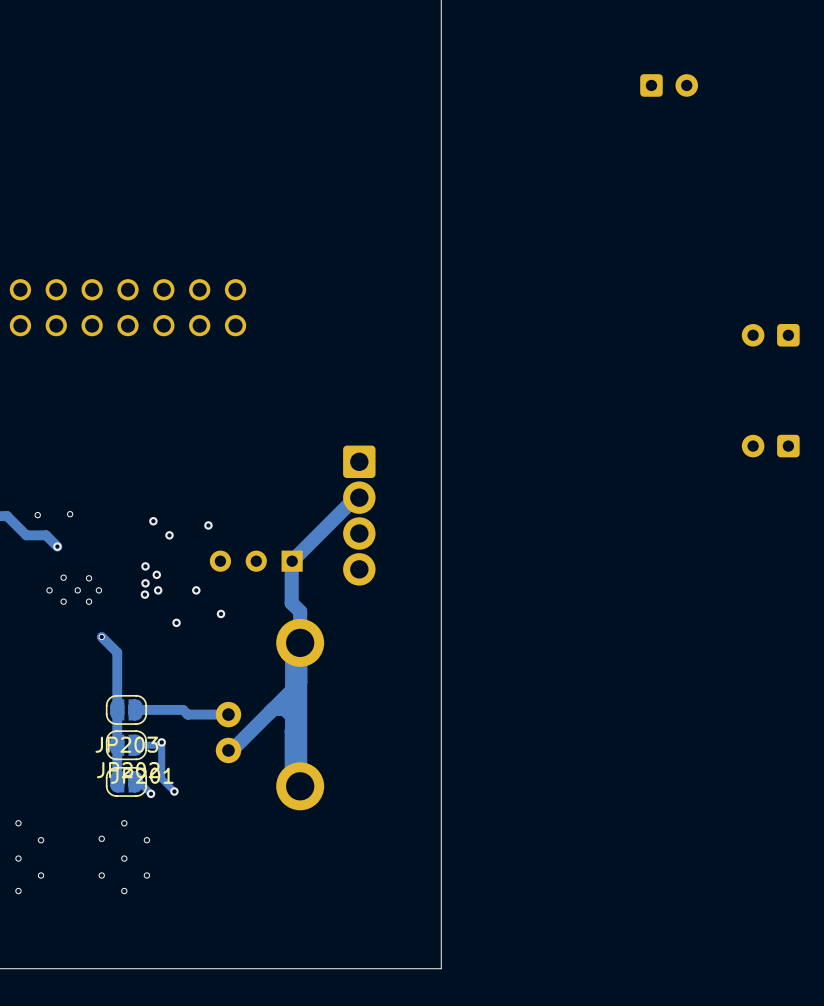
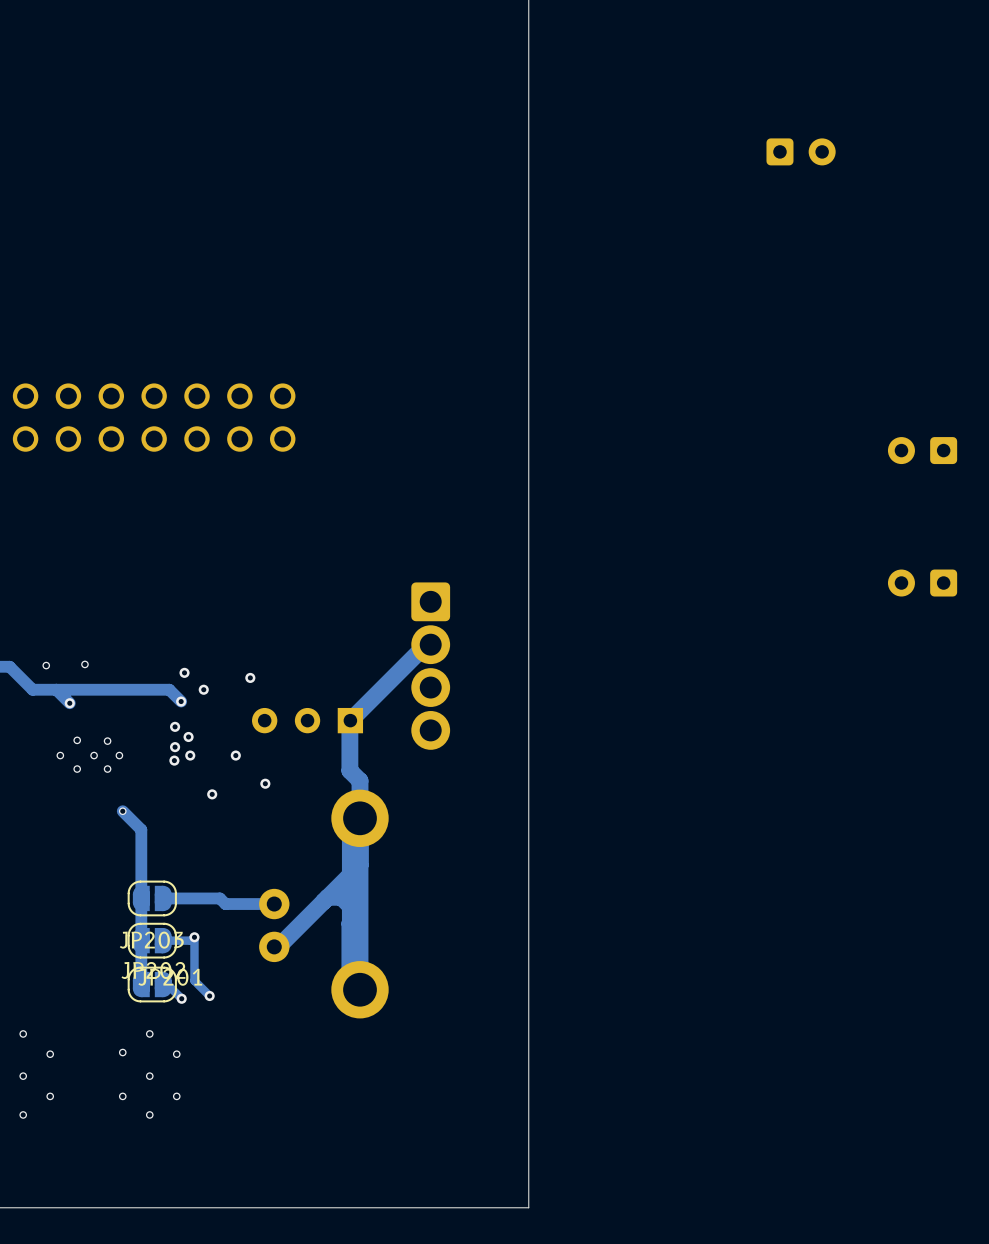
track: none -> (56, 689) (169, 689) (181, 701)
via: none -> (181, 701)

